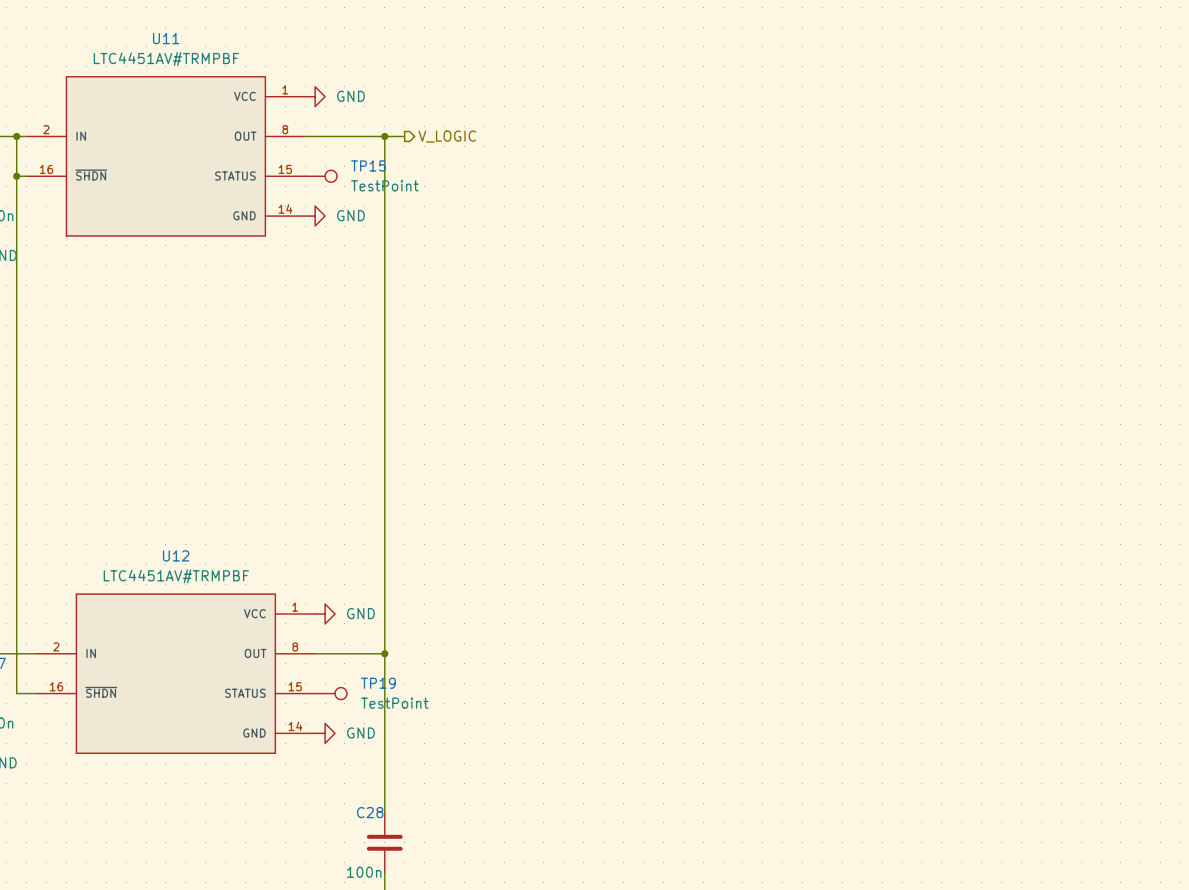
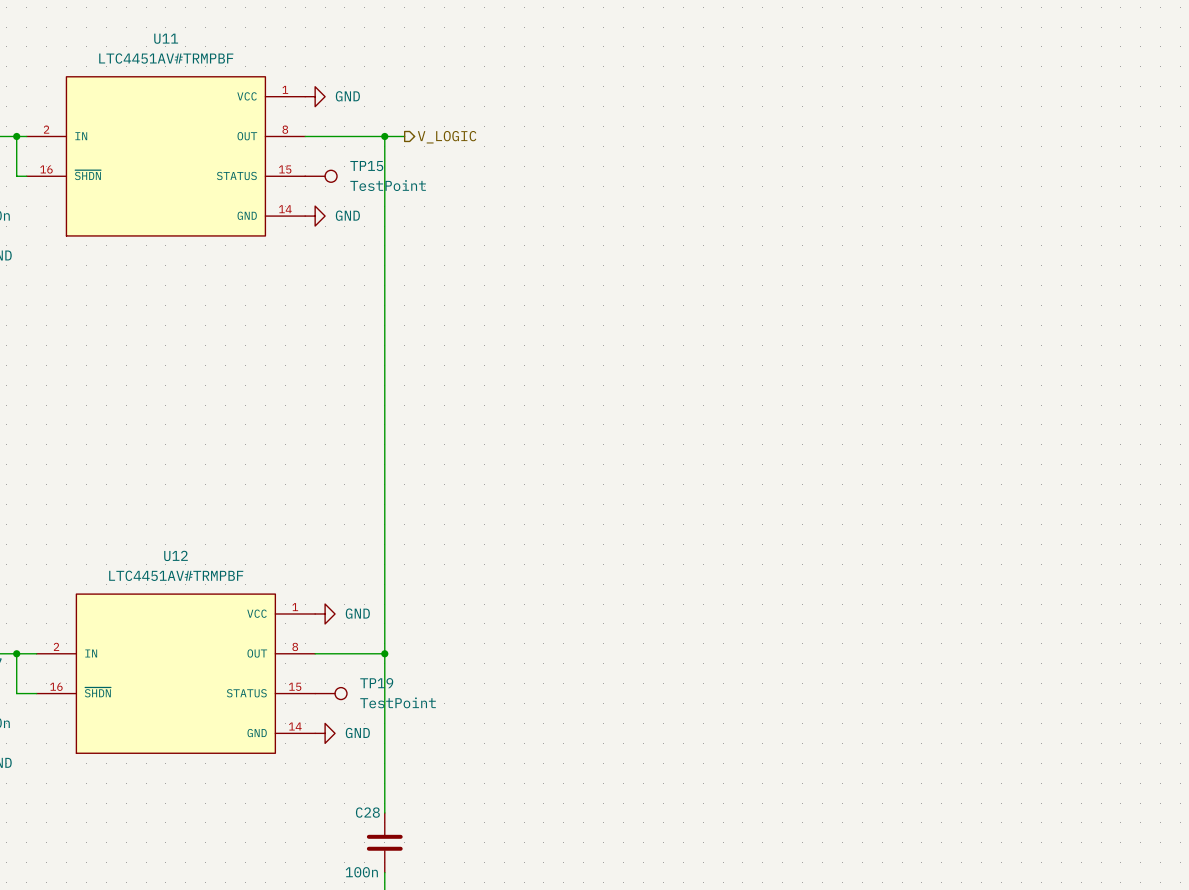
wire: (16, 176) (16, 653) -> none
junction: (16, 176) -> none
junction: none -> (16, 653)

